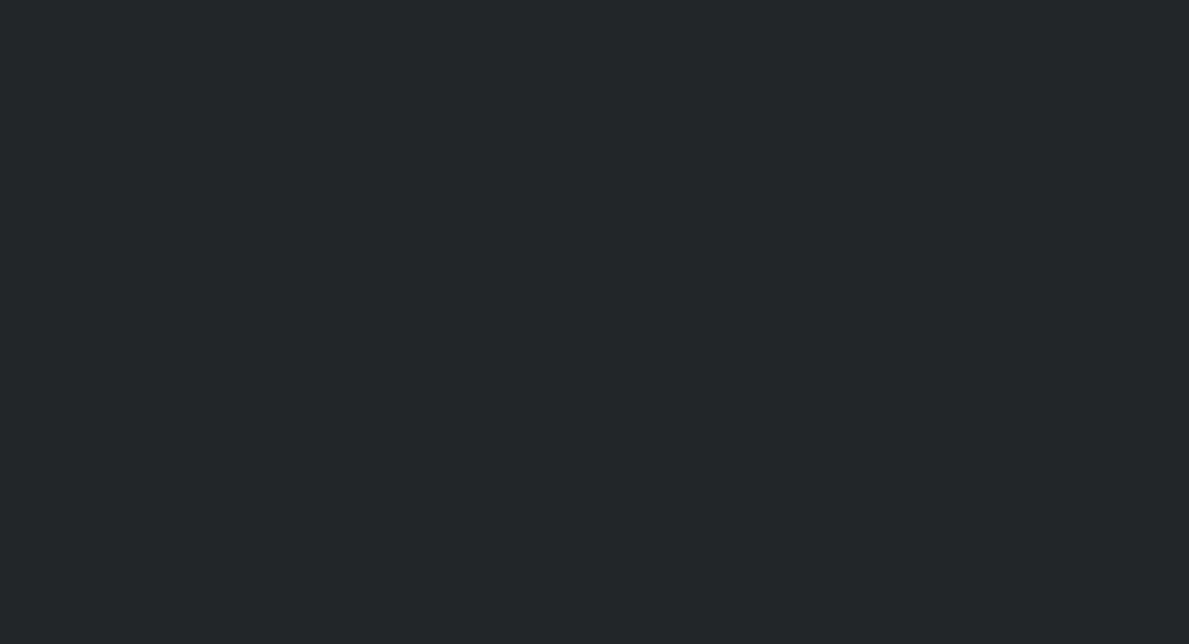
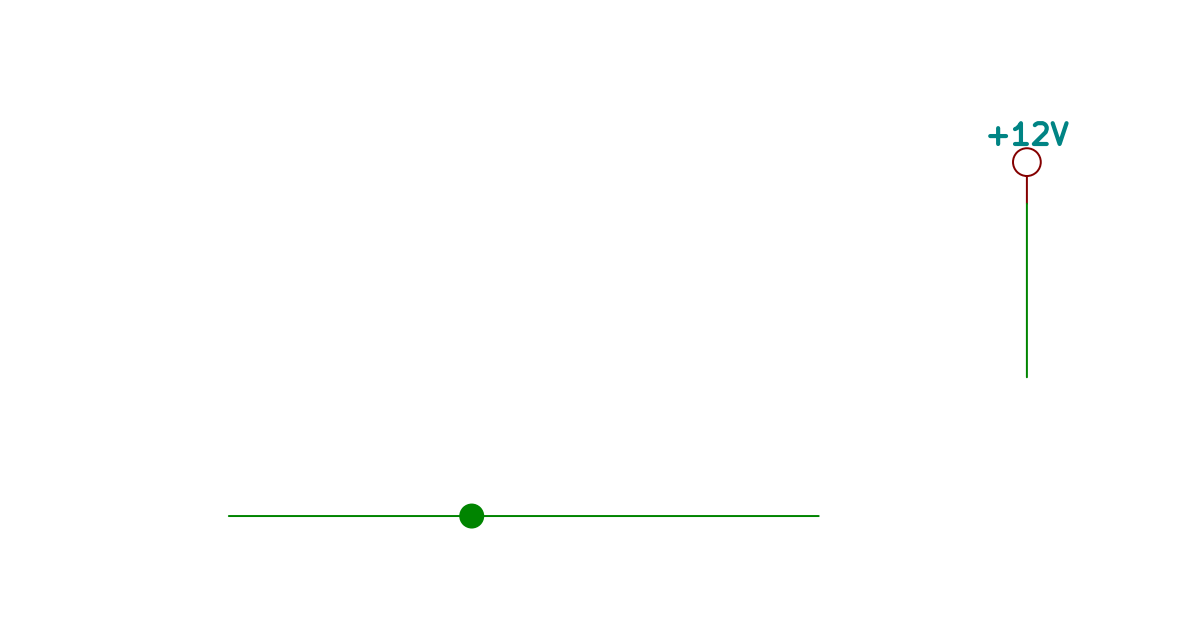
power symbol: none -> +12V (1026, 176)
wire: none -> (1026, 203) (1026, 377)
wire: none -> (228, 516) (818, 516)
junction: none -> (471, 516)

